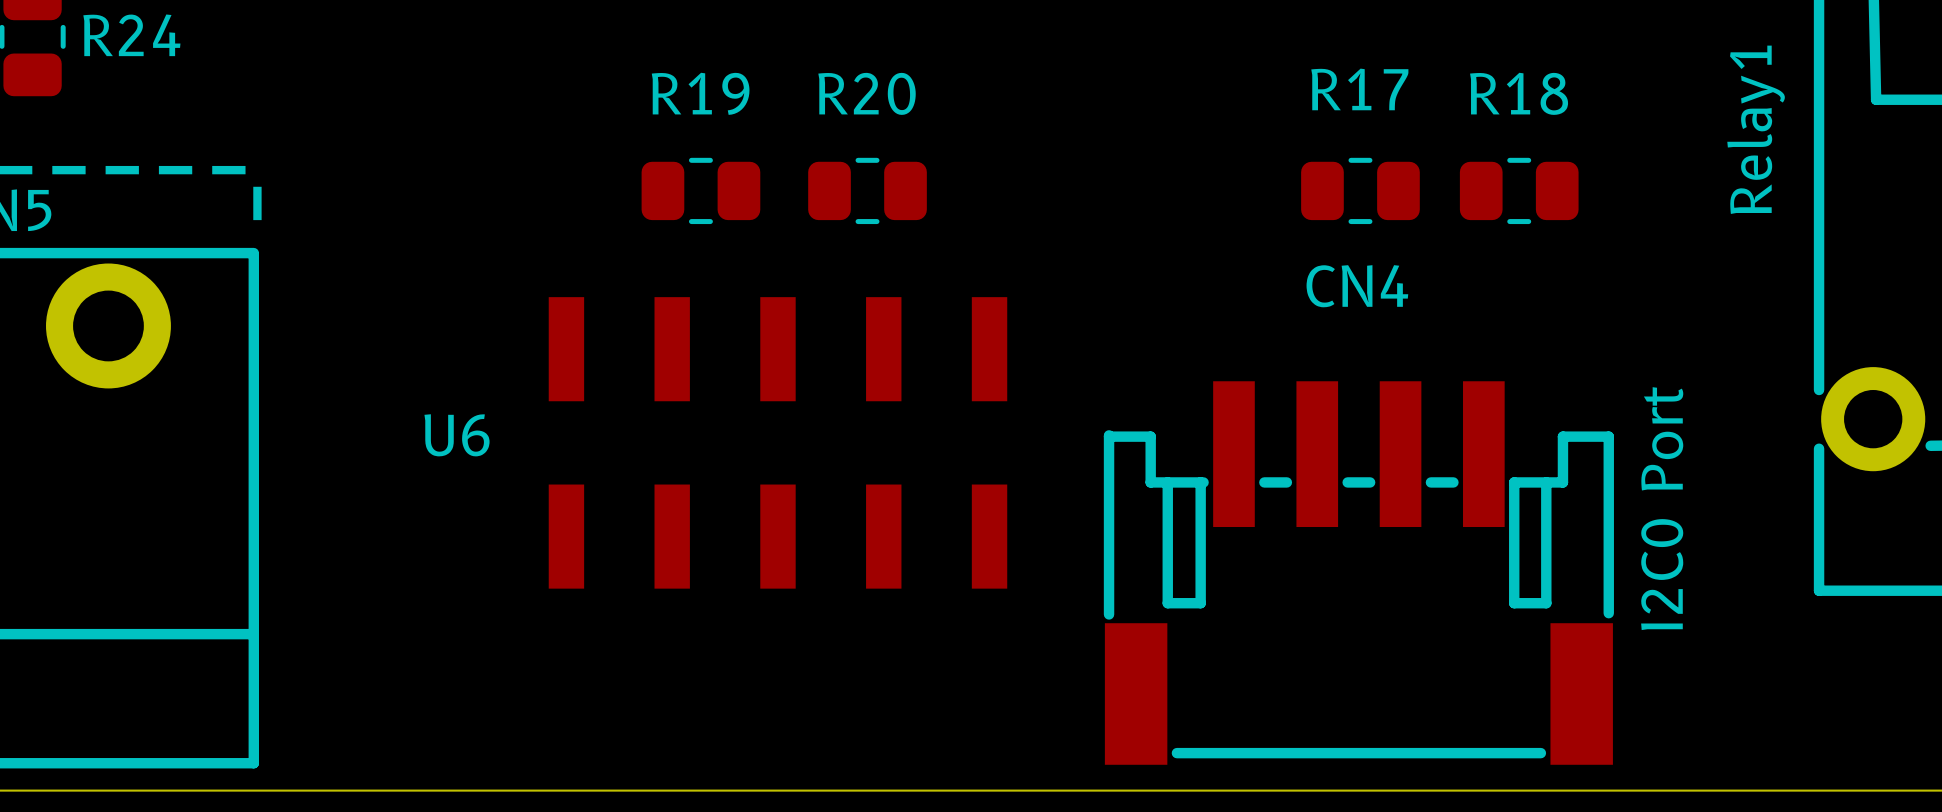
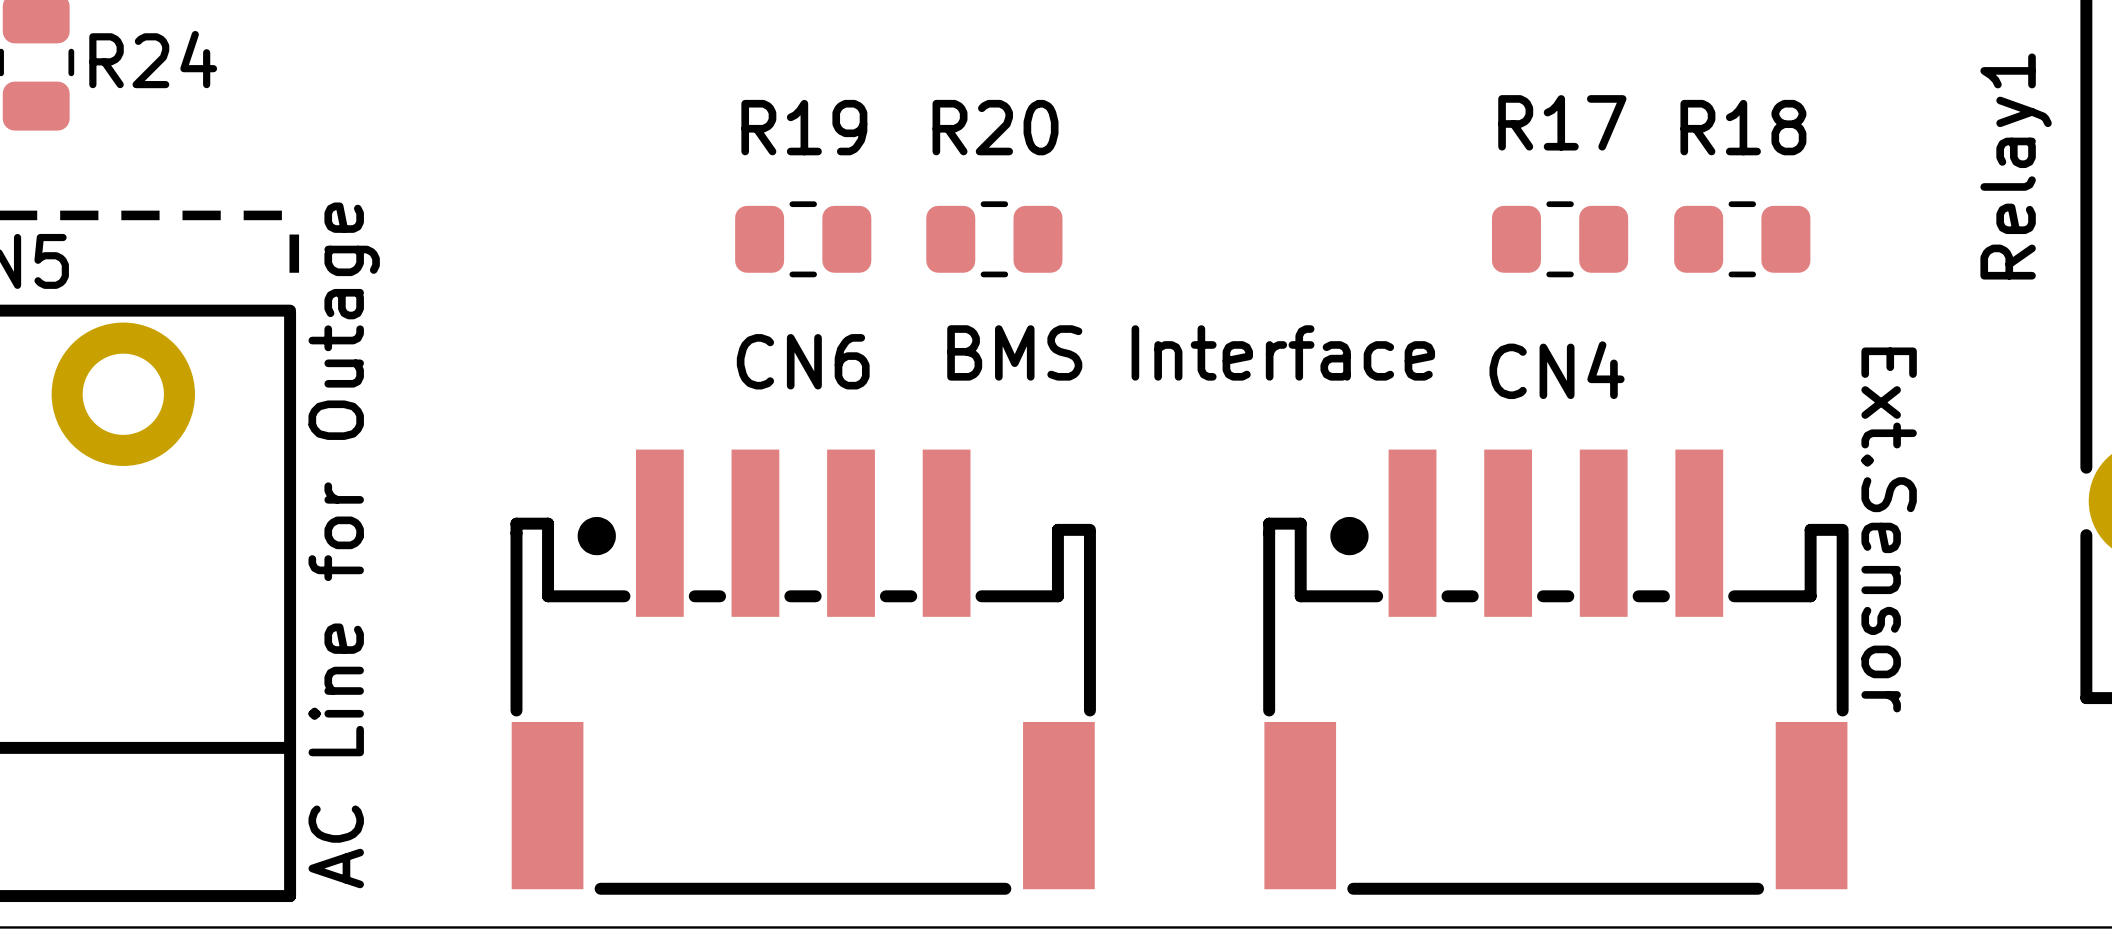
text: none -> BMS Interface (1191, 352)
CN4 footprint: [1103, 381, 1614, 765] -> [1263, 449, 1849, 895]
text: none -> Ext.Sensor (1889, 529)
U6: (777, 442) -> none
text: I2C0 Port (1662, 508) -> none
text: none -> AC Line for Outage (344, 545)
CN6: none -> (803, 672)

